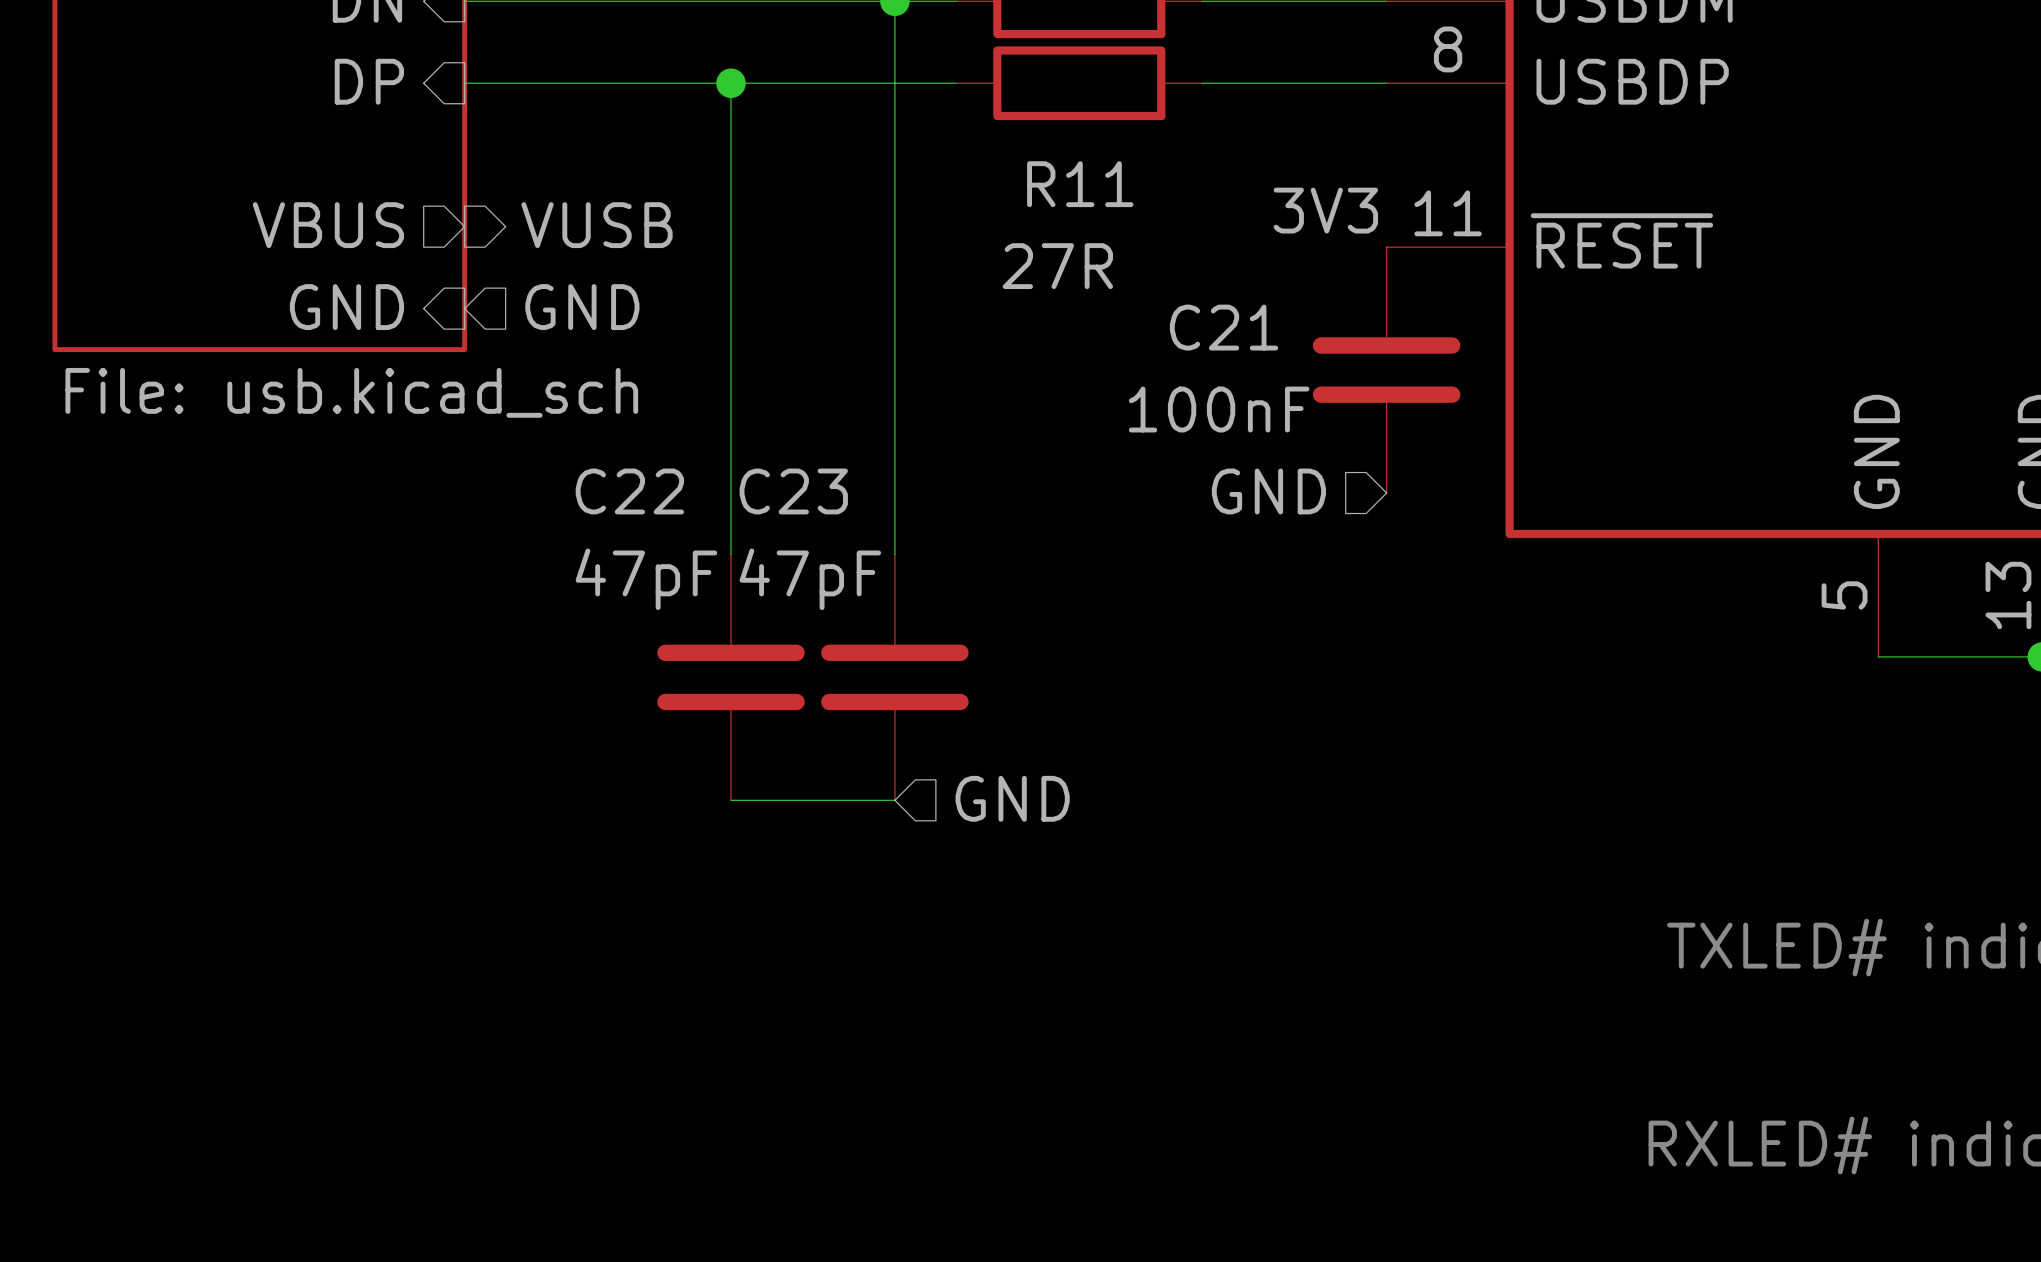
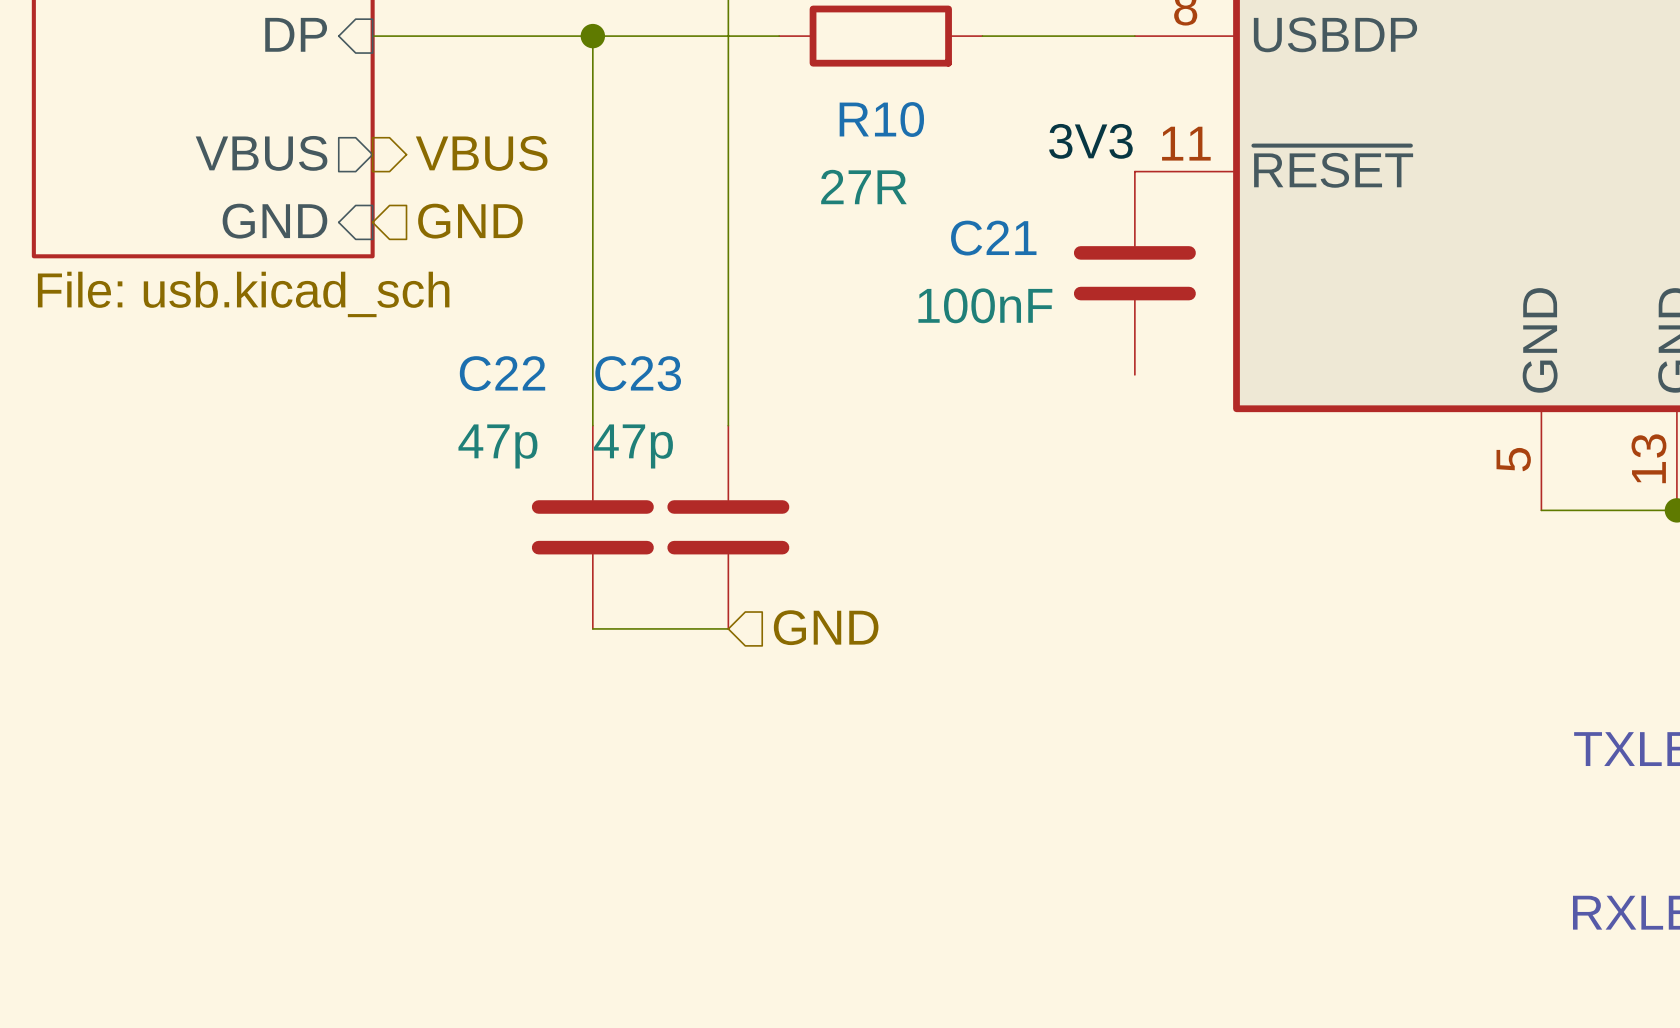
R11 name: R11 (1080, 184) -> R10 (881, 119)
hierarchical label: VUSB (597, 225) -> VBUS (481, 153)
hierarchical label: GND (1268, 491) -> none
C22 value: 47pF (646, 579) -> 47p (497, 446)
C23 value: 47pF (810, 579) -> 47p (633, 446)

